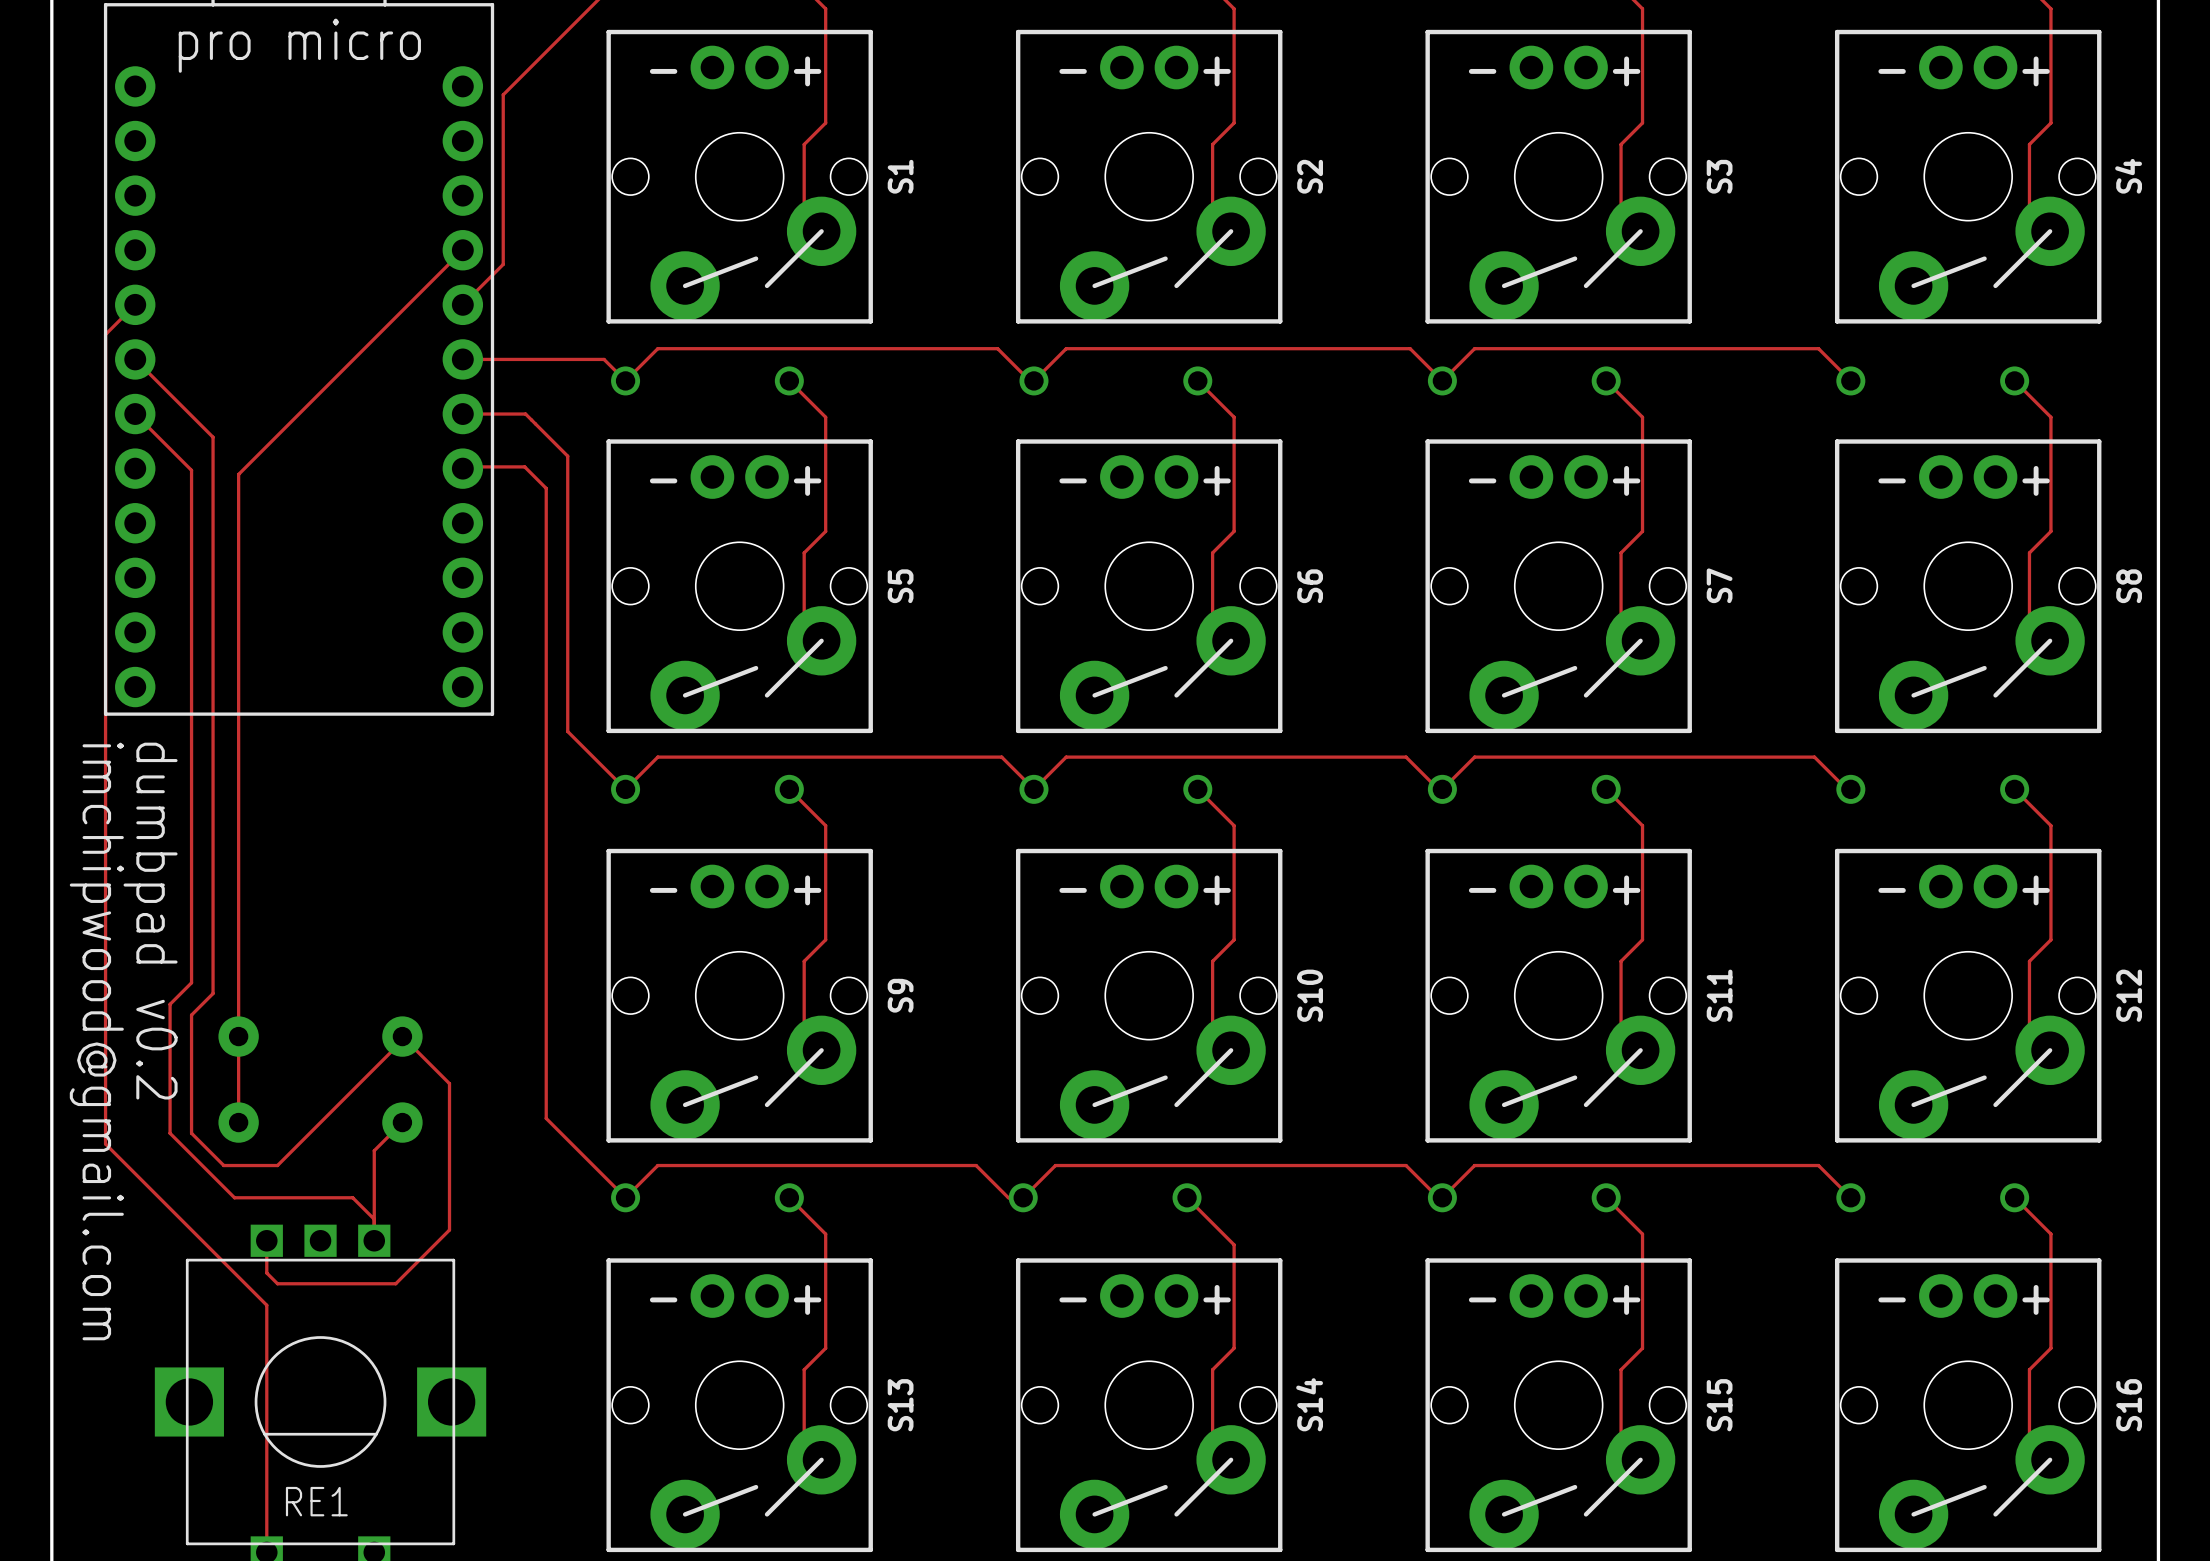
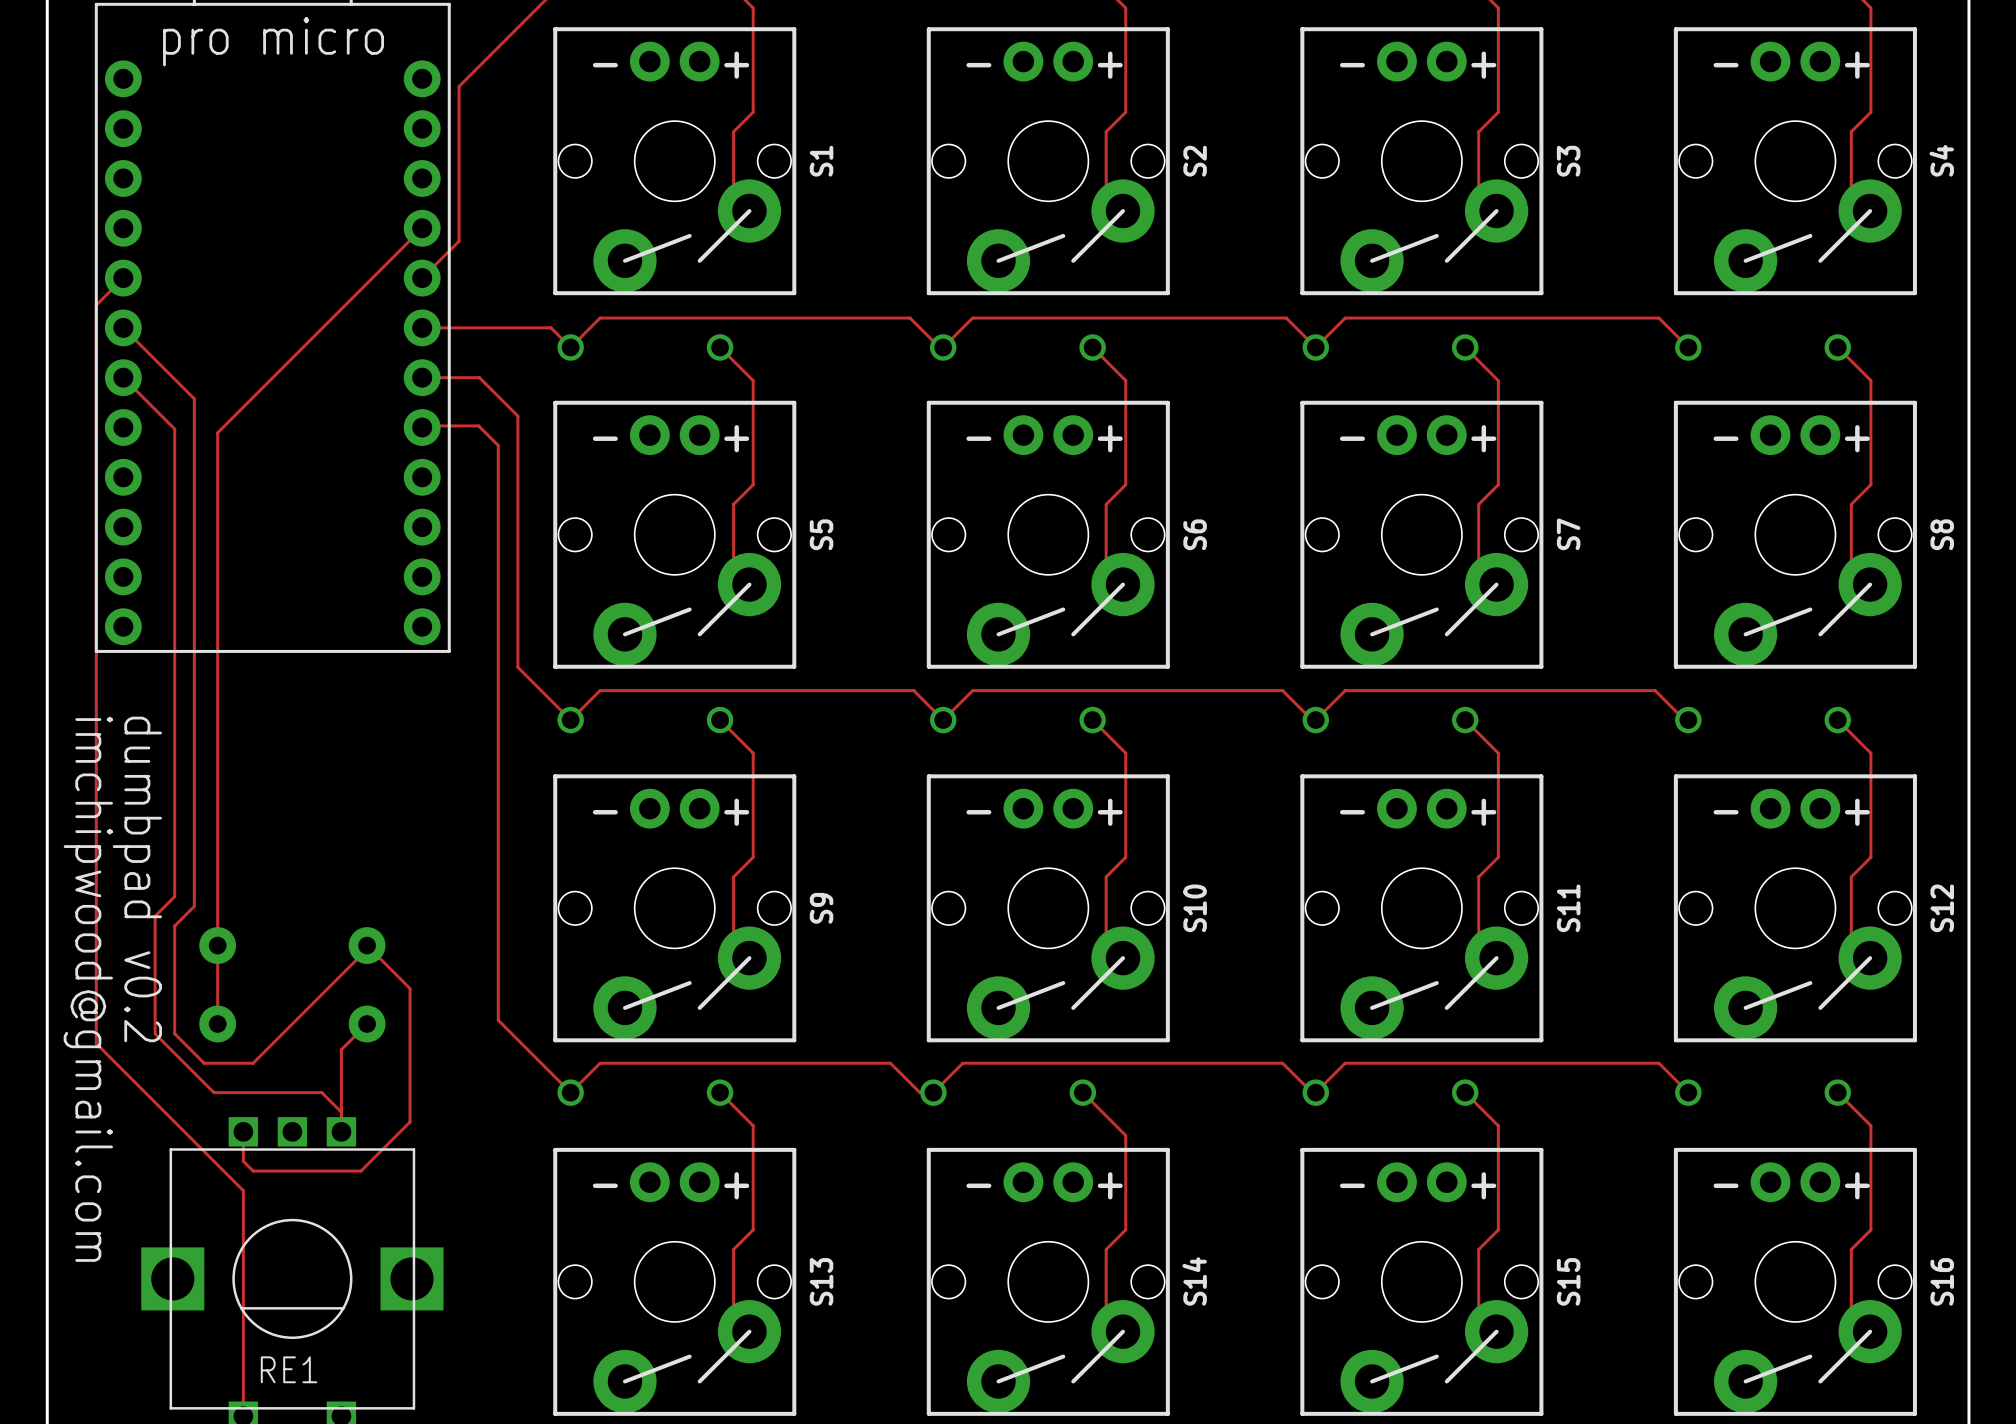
text position: dumbpad v0.2 (150, 921) -> dumbpad v0.2 (137, 879)
text position: imchipwood@gmail.com (96, 1041) -> imchipwood@gmail.com (88, 989)

